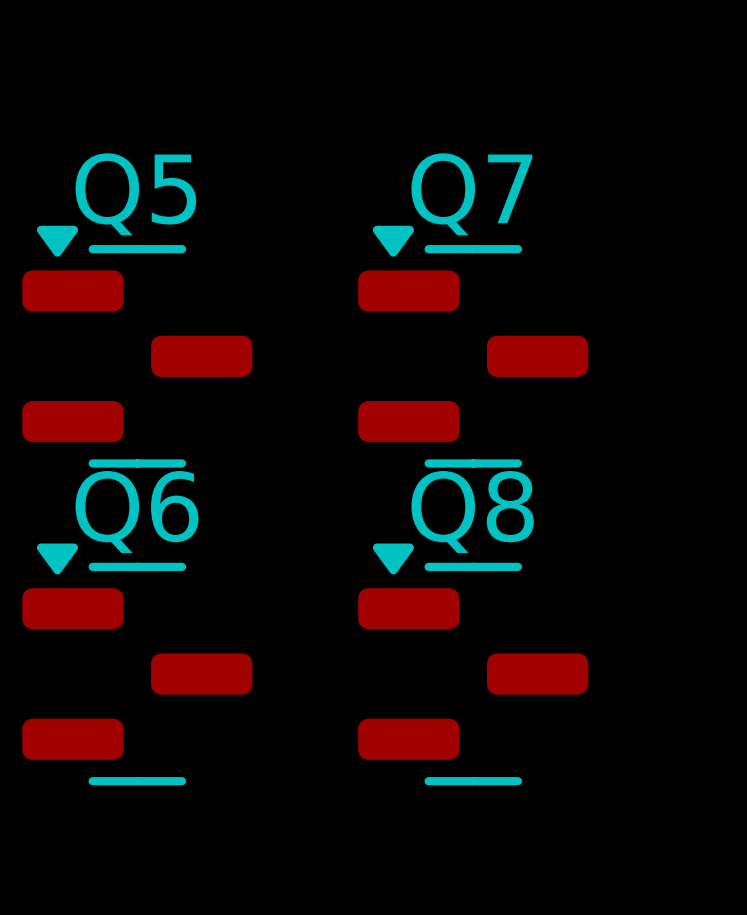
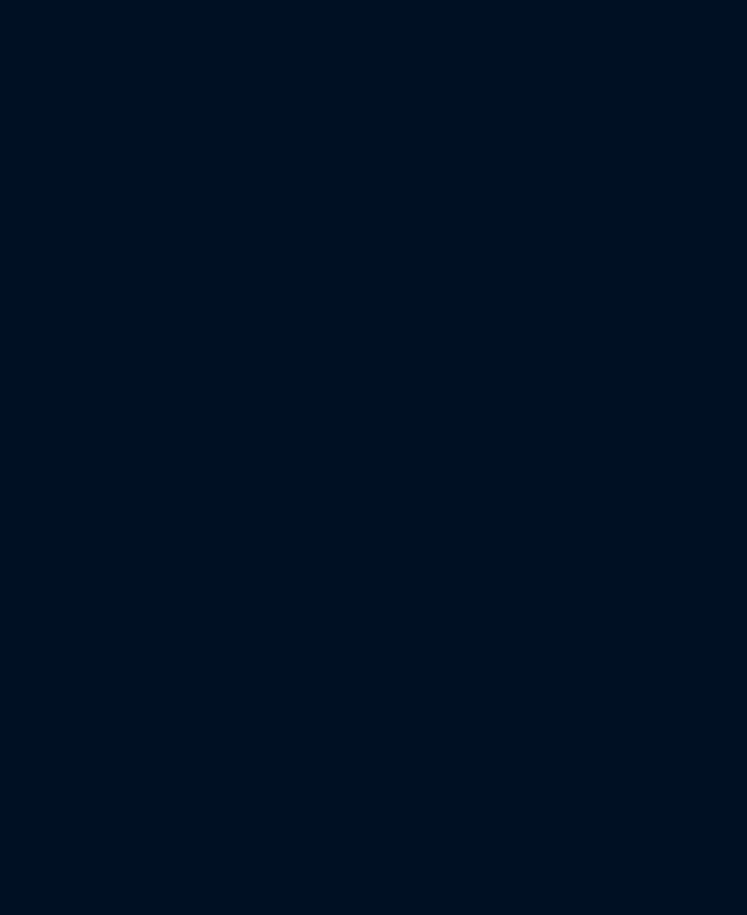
Q5: (137, 346) -> none
Q7: (473, 346) -> none
Q6: (137, 664) -> none
Q8: (473, 664) -> none

